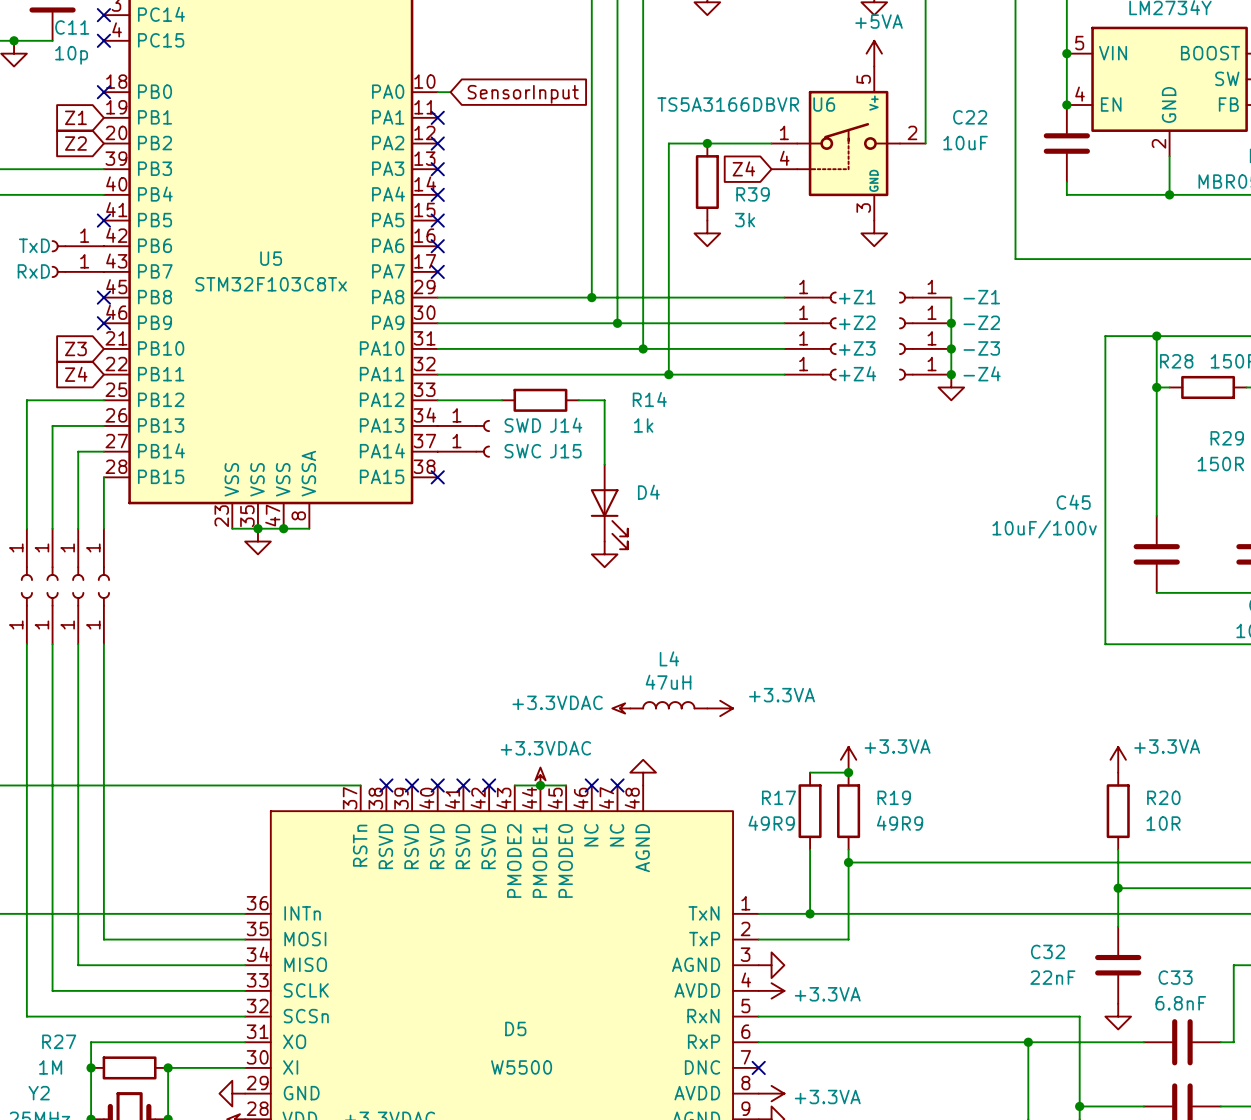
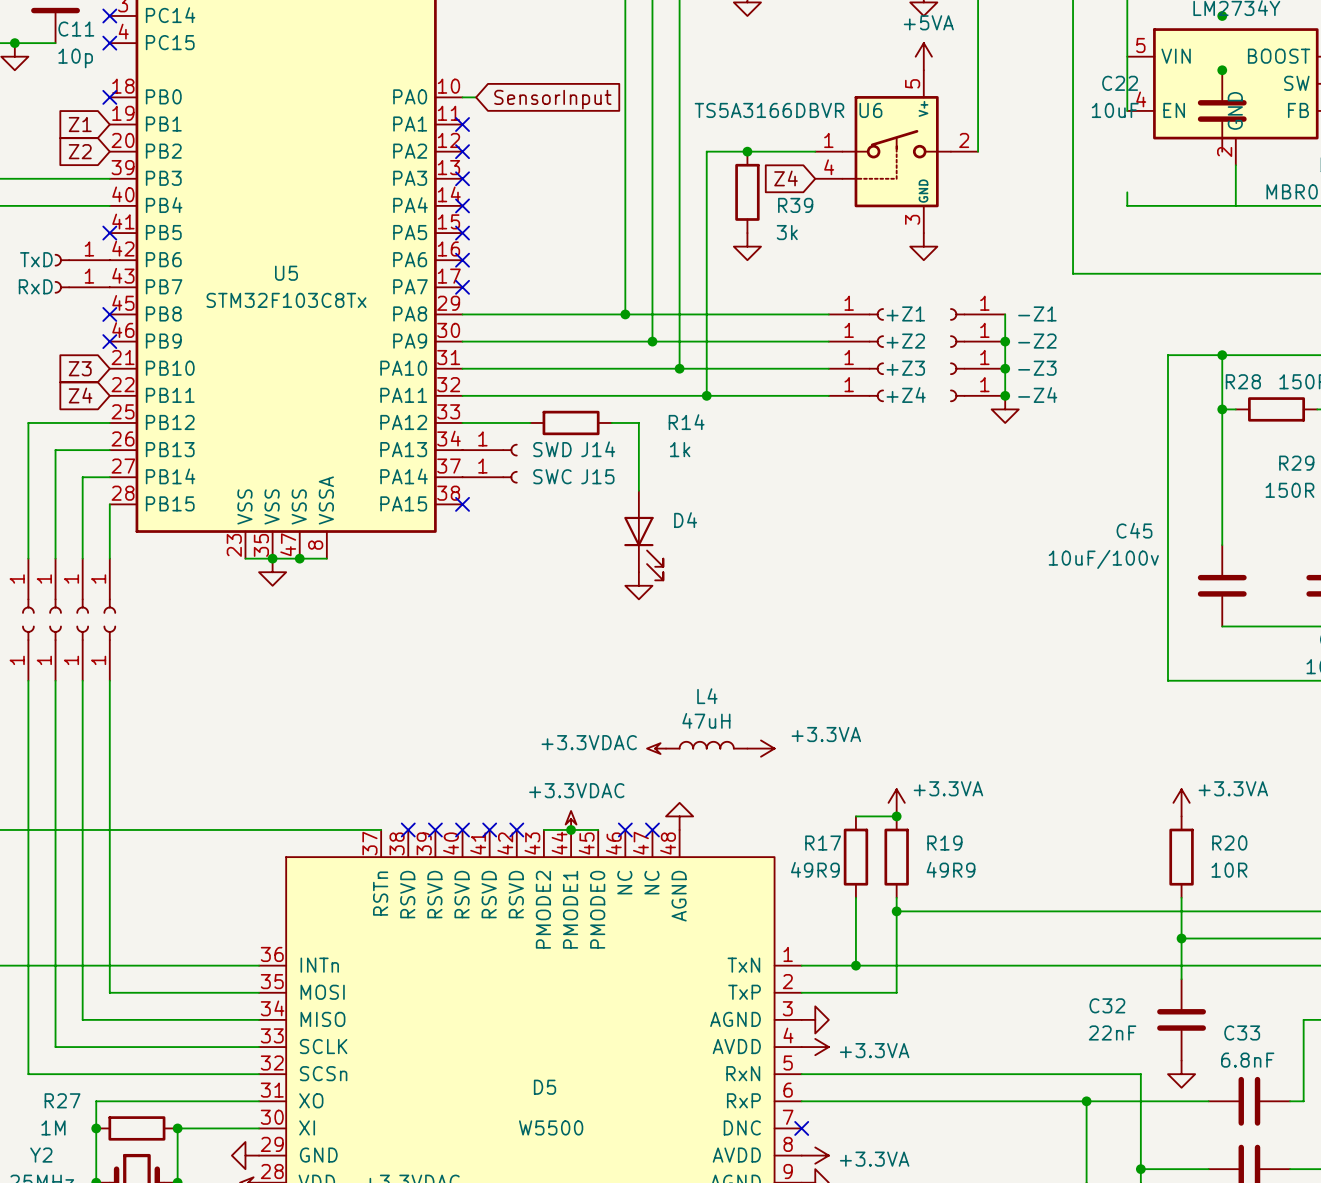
junction: none -> (1222, 15)
junction: (1066, 53) -> none
junction: none -> (1222, 70)
junction: (1066, 105) -> none
C22 position: (1066, 143) -> (1222, 110)
junction: (1169, 194) -> none

